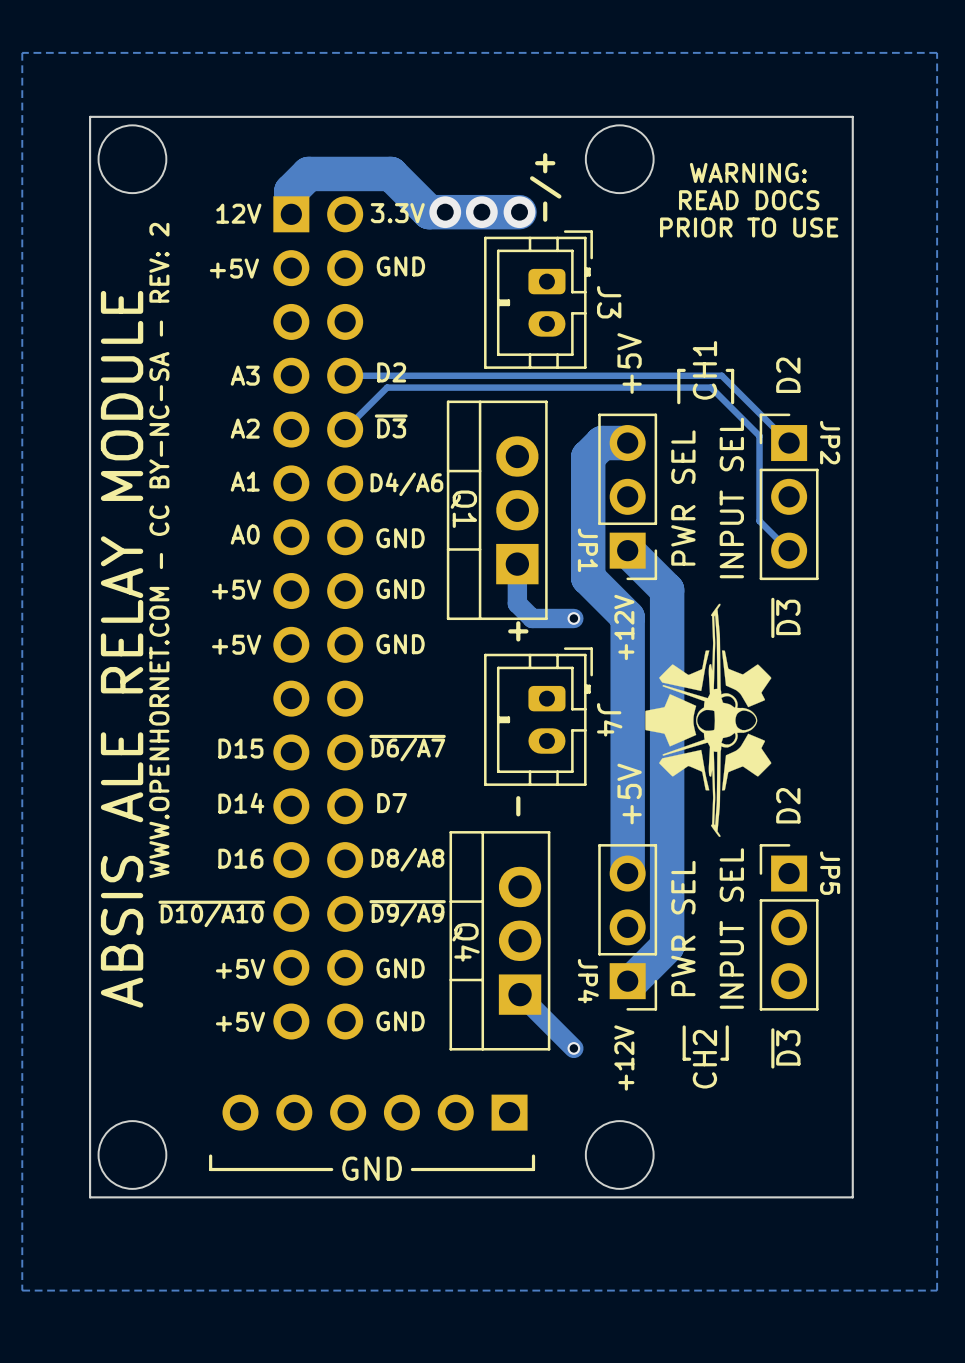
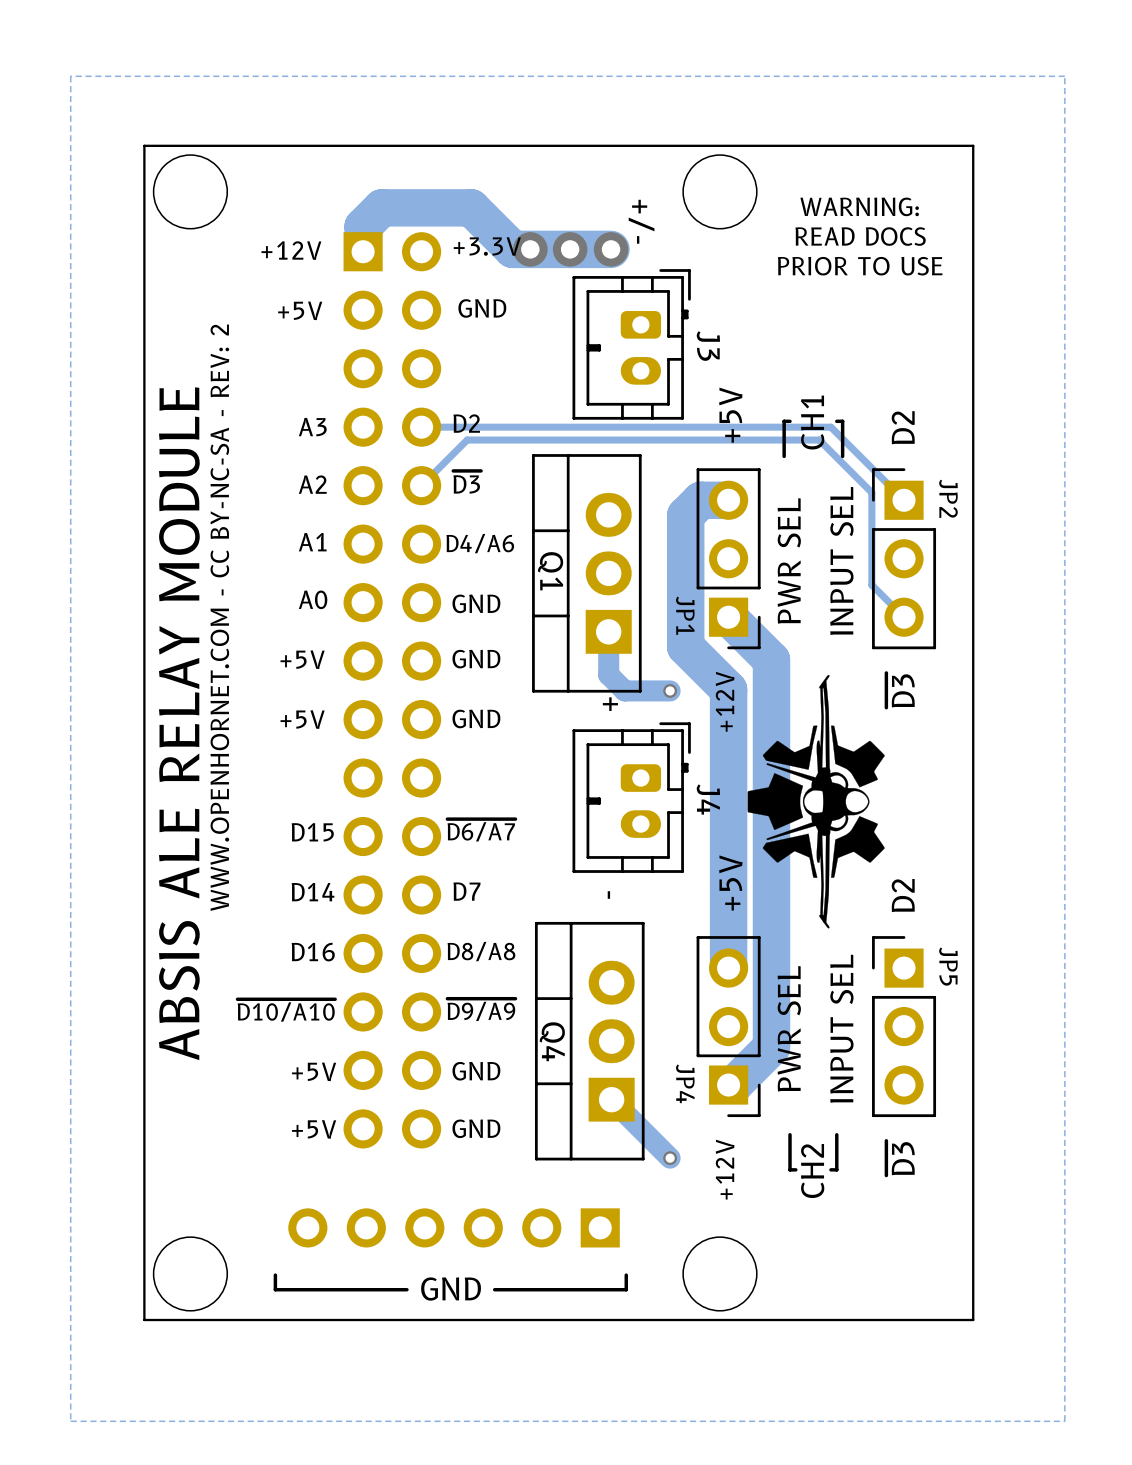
text: 12V (238, 213) -> +12V (291, 250)
text: 3.3V (397, 213) -> +3.3V (487, 246)

